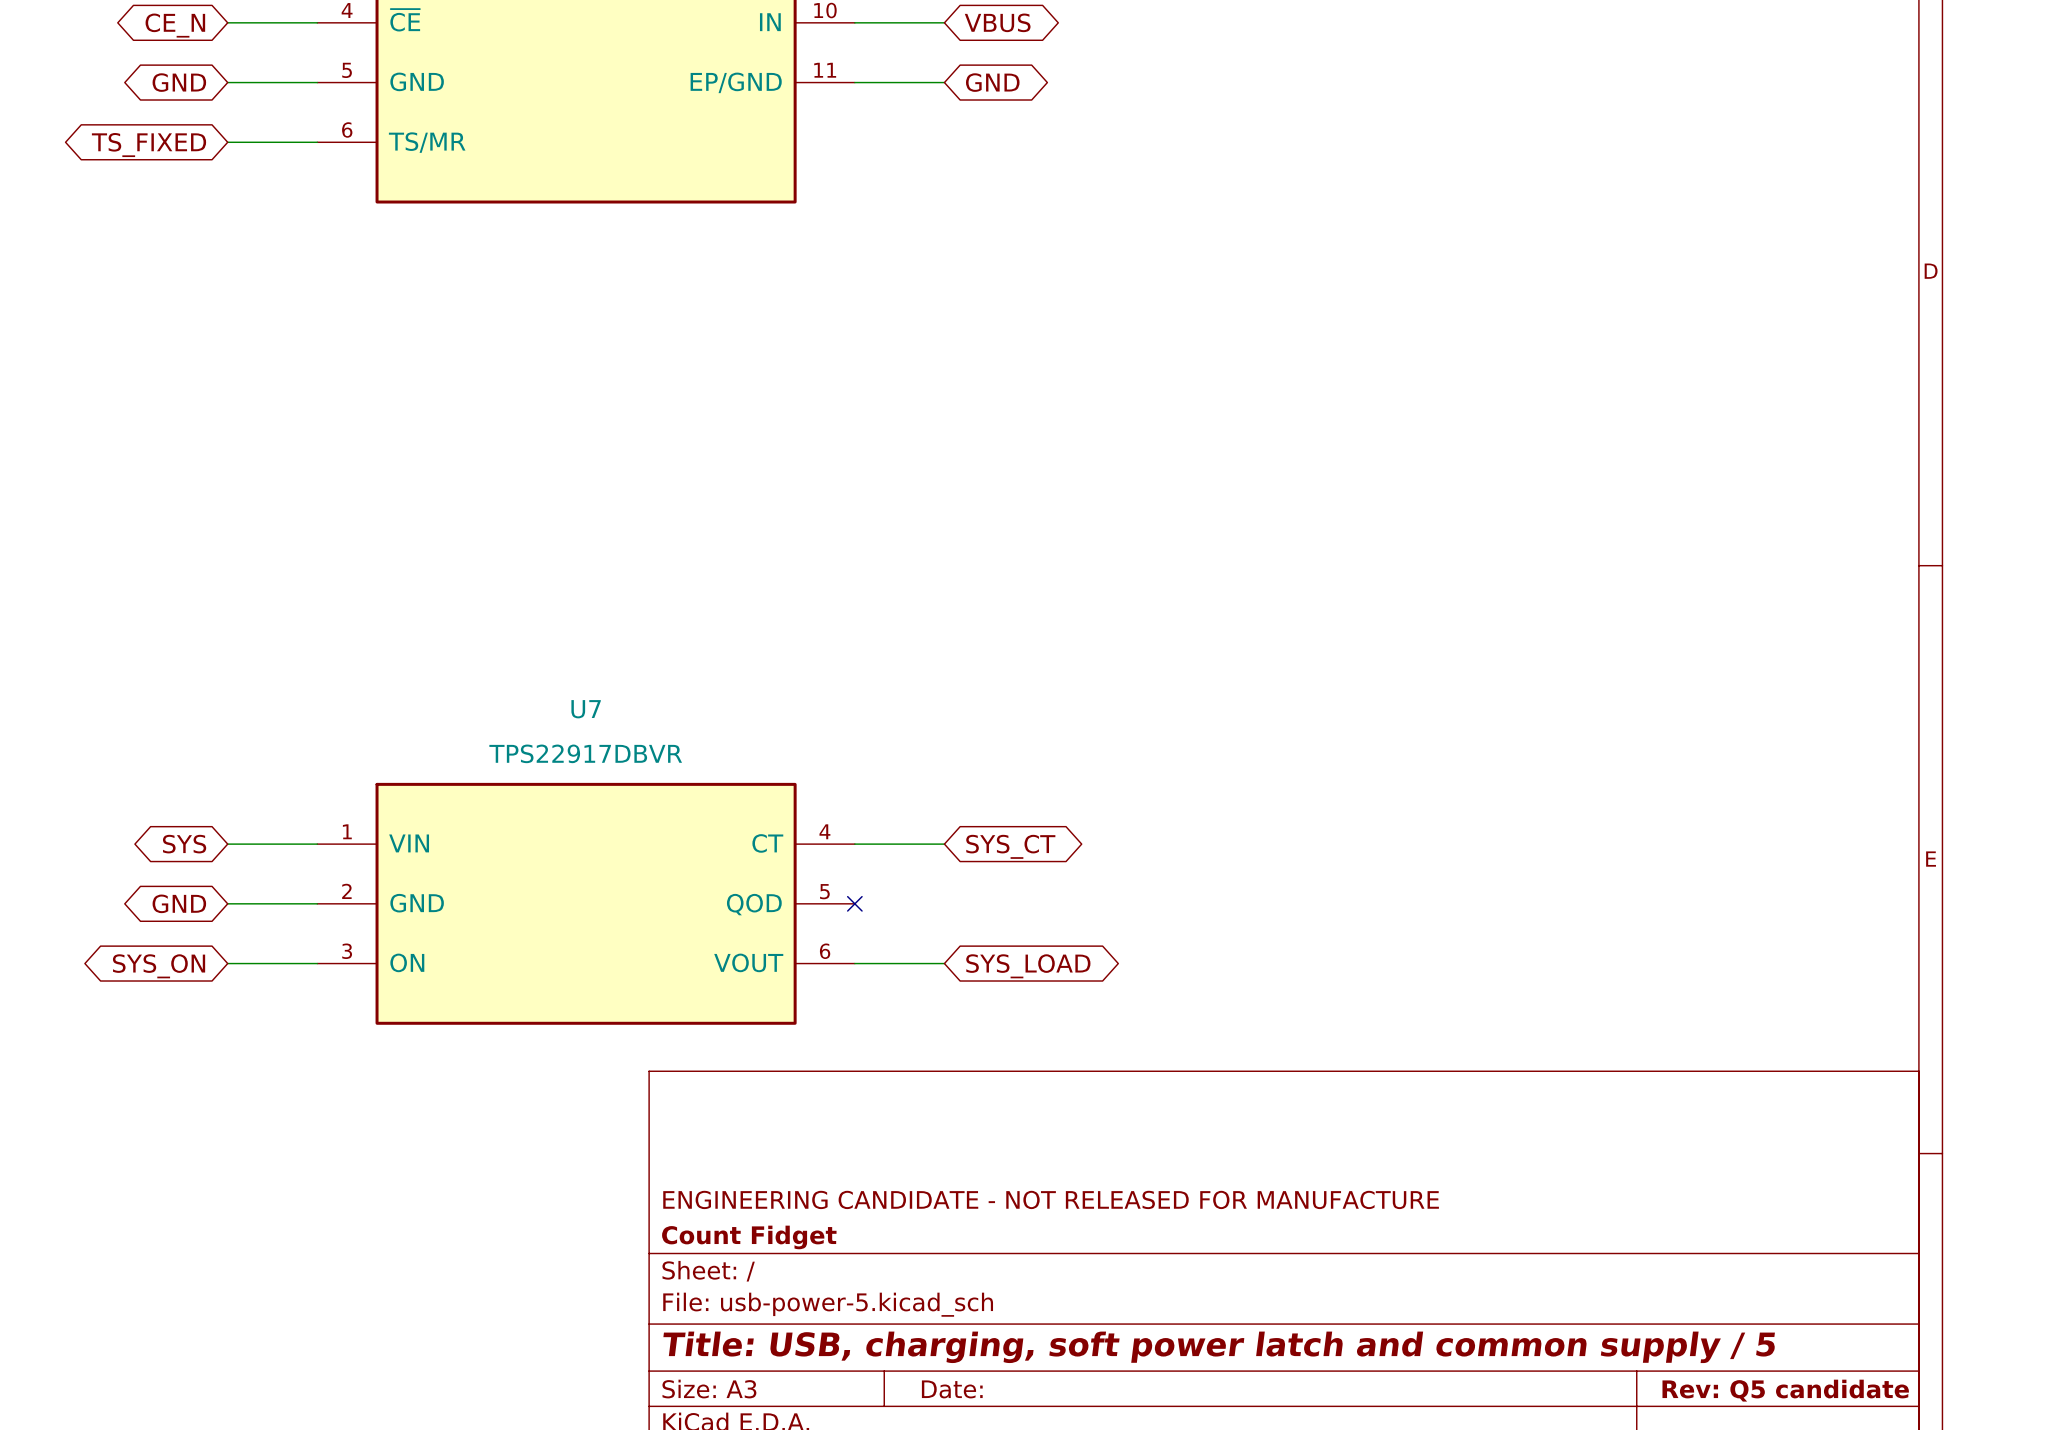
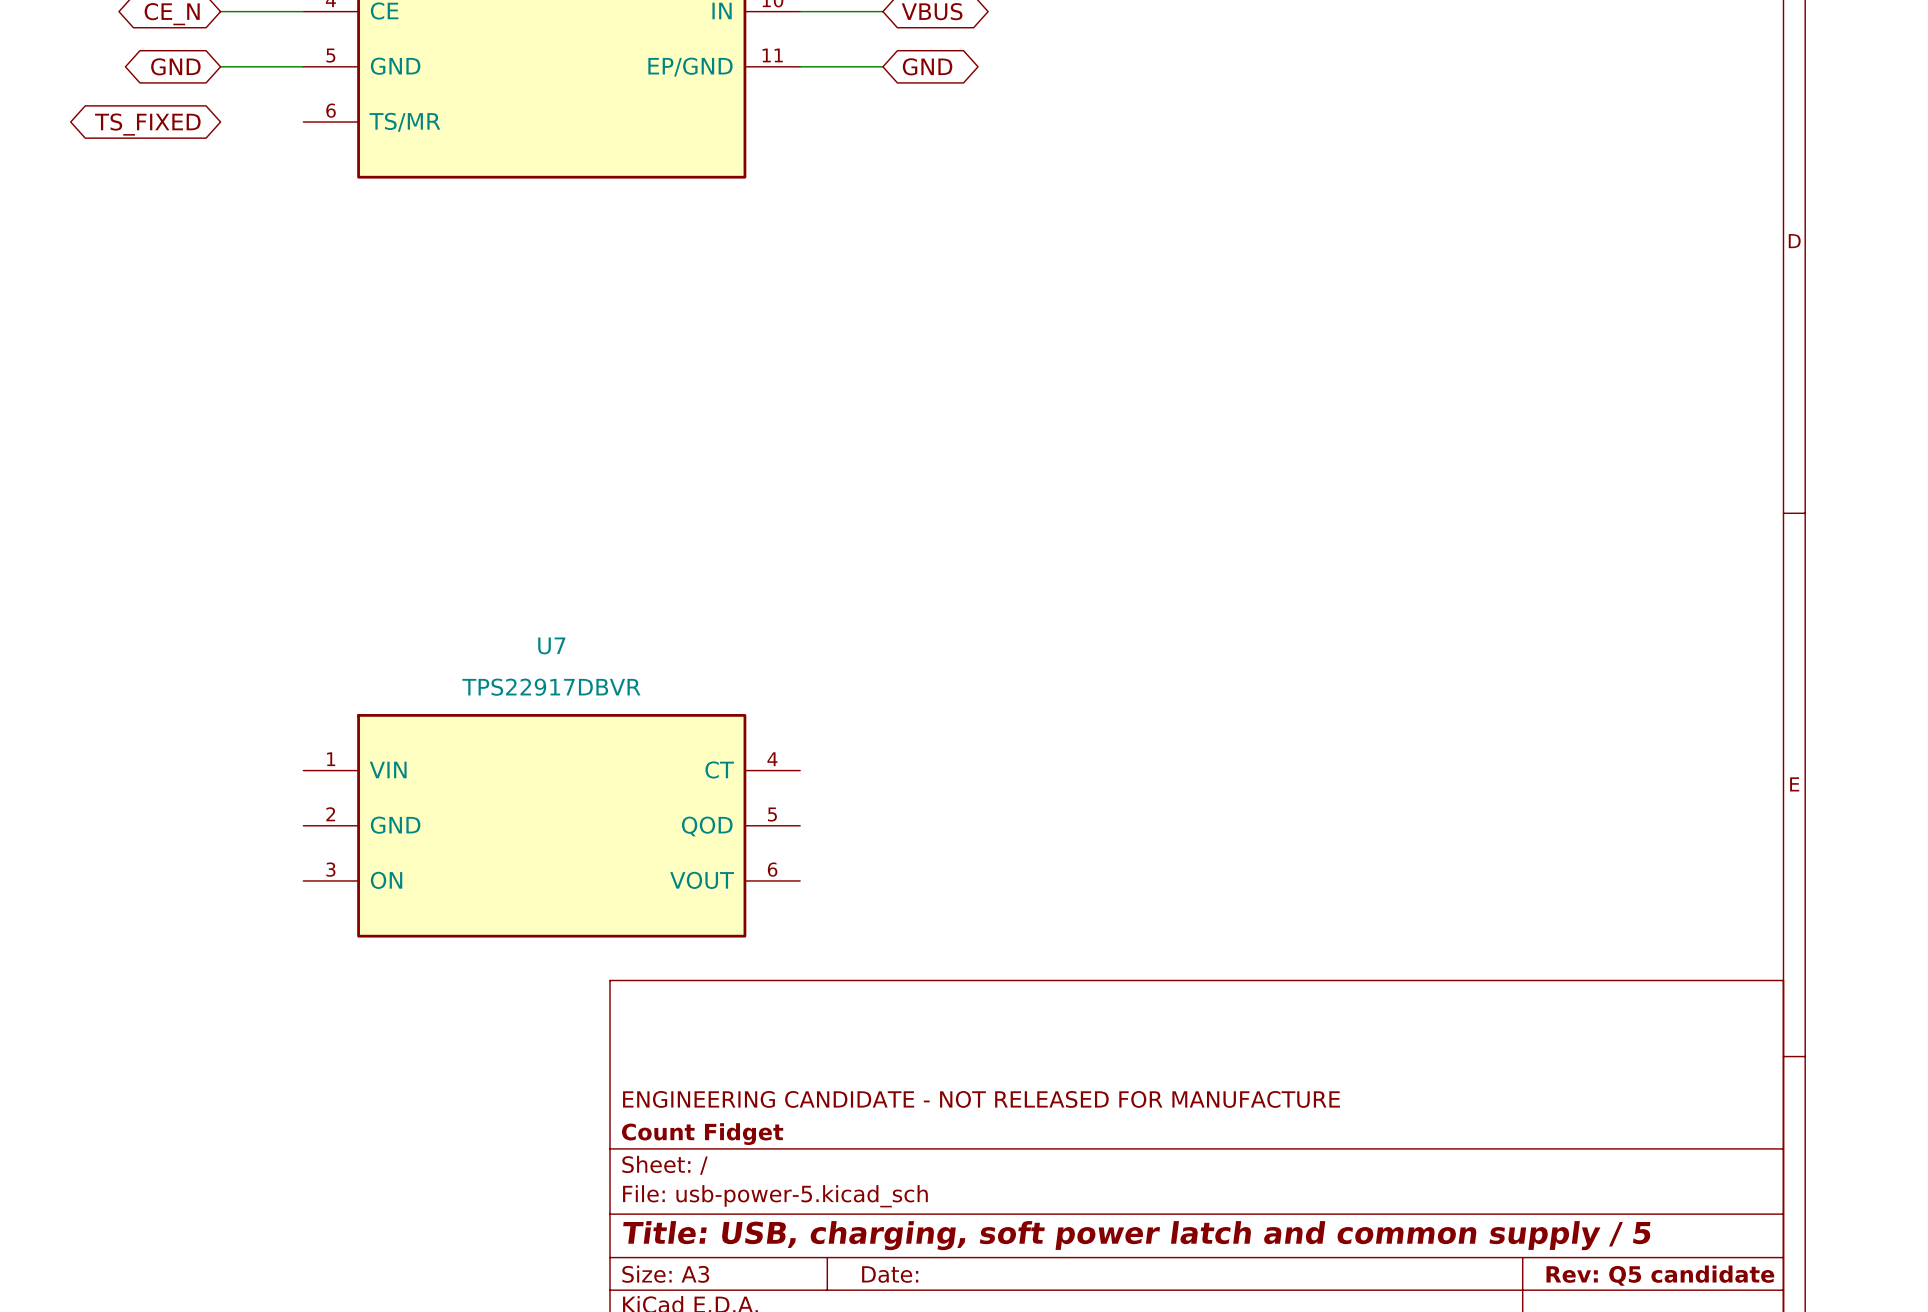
wire: (227, 142) (317, 142) -> none
global label: SYS (184, 844) -> none
wire: (227, 844) (317, 844) -> none
wire: (854, 844) (944, 844) -> none
global label: SYS_CT (1010, 846) -> none
global label: GND (179, 903) -> none
wire: (227, 903) (317, 903) -> none
no-connect mark: (854, 903) -> none
wire: (227, 963) (317, 963) -> none
wire: (854, 963) (944, 963) -> none
global label: SYS_ON (159, 966) -> none
global label: SYS_LOAD (1028, 966) -> none

